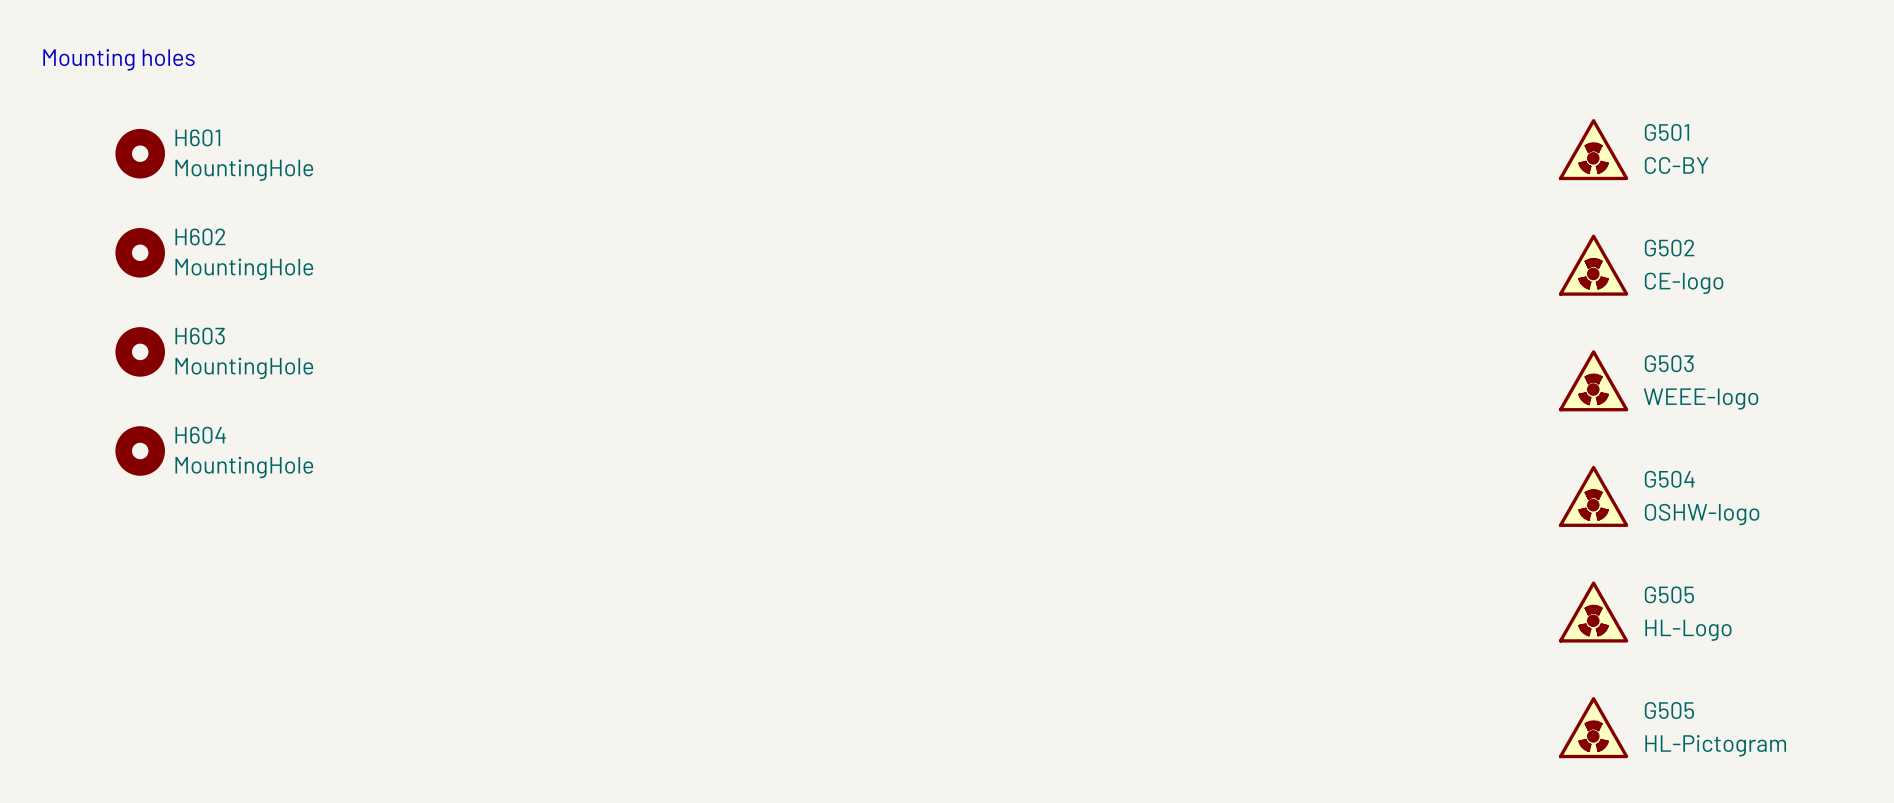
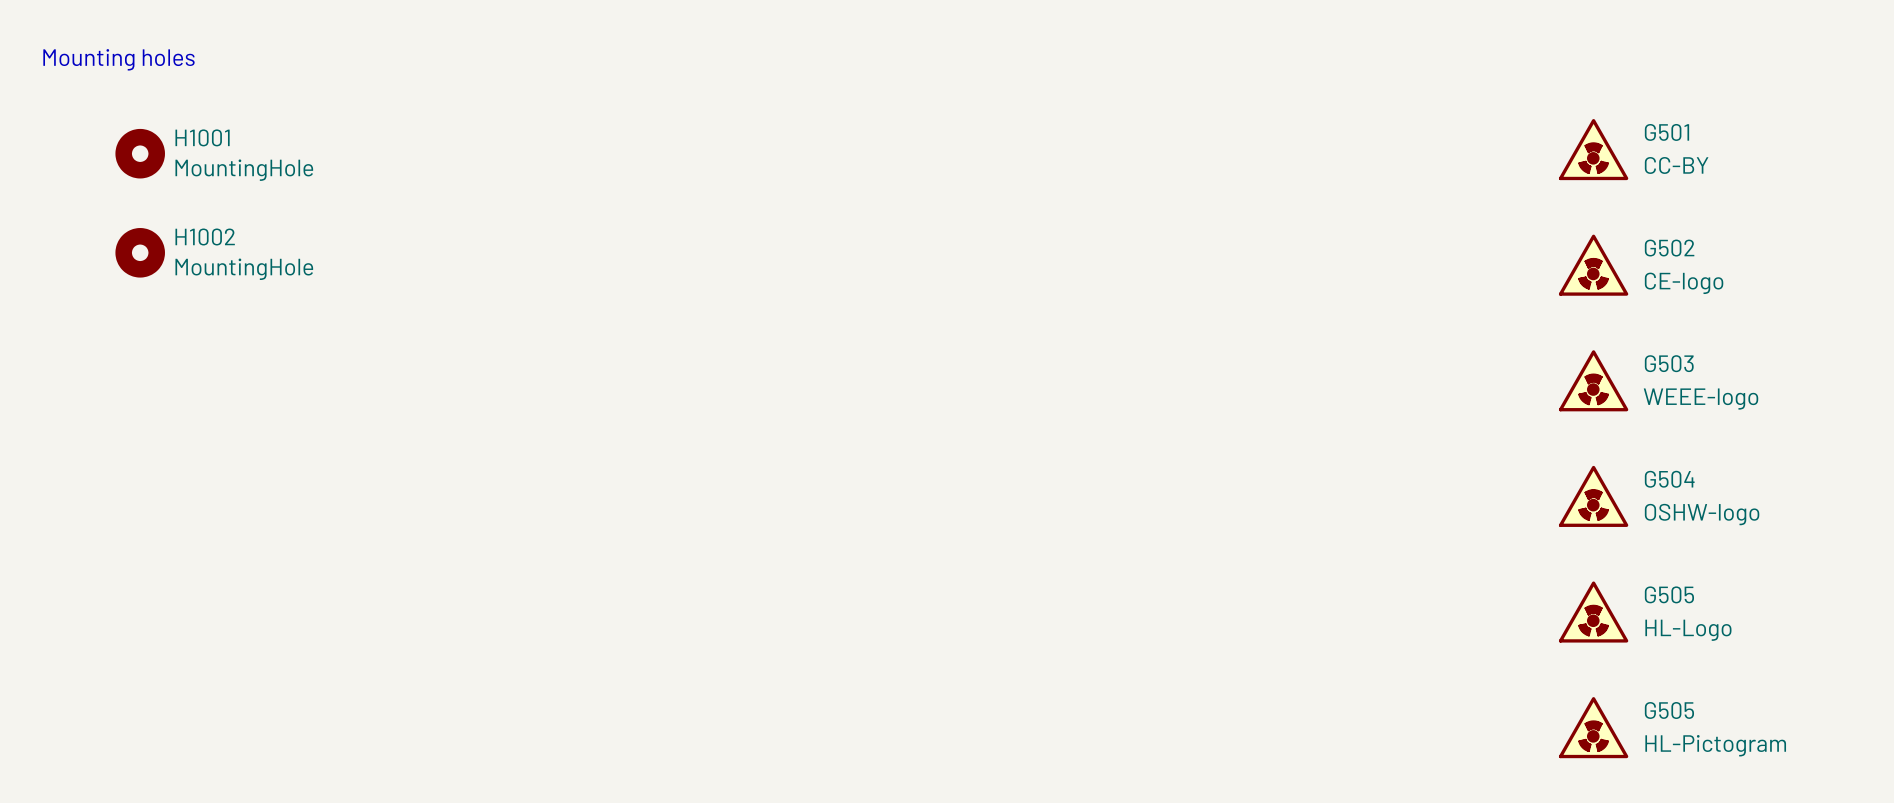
H601 name: H601 (197, 137) -> H1001 (202, 137)
H602 name: H602 (200, 236) -> H1002 (205, 236)
H603: MountingHole (140, 351) -> none
H604: MountingHole (140, 450) -> none

